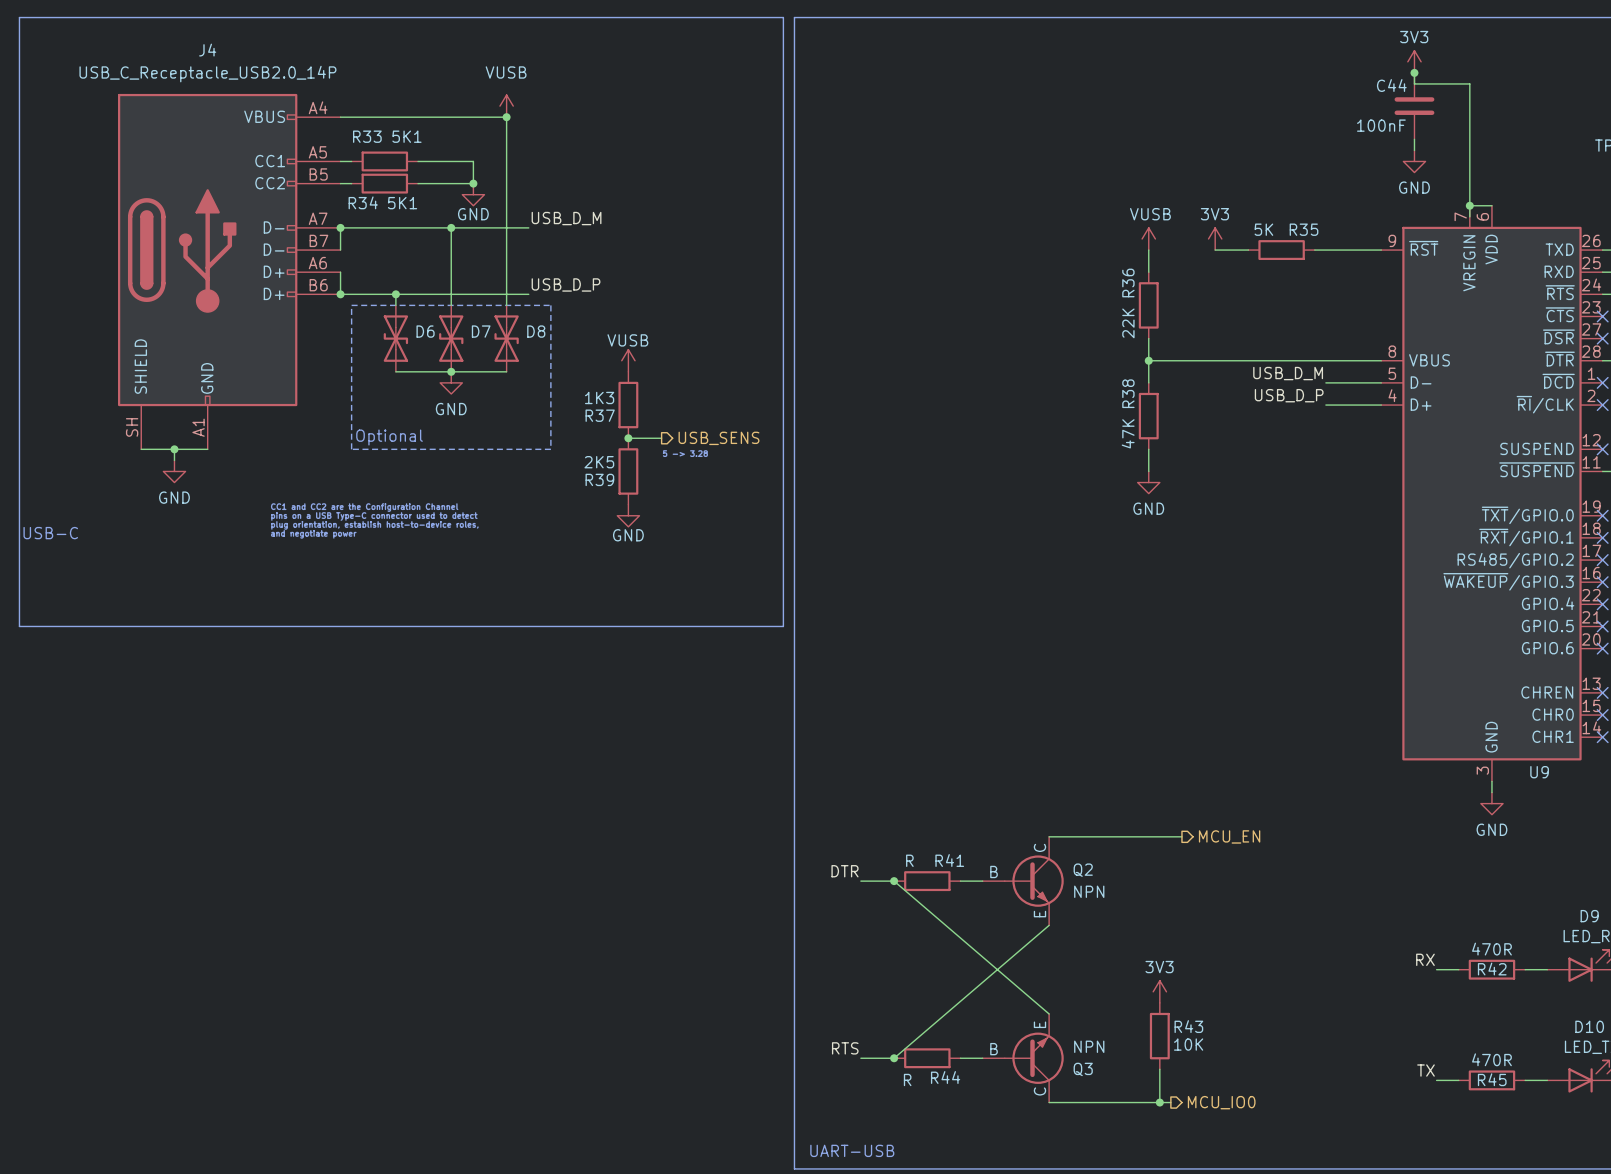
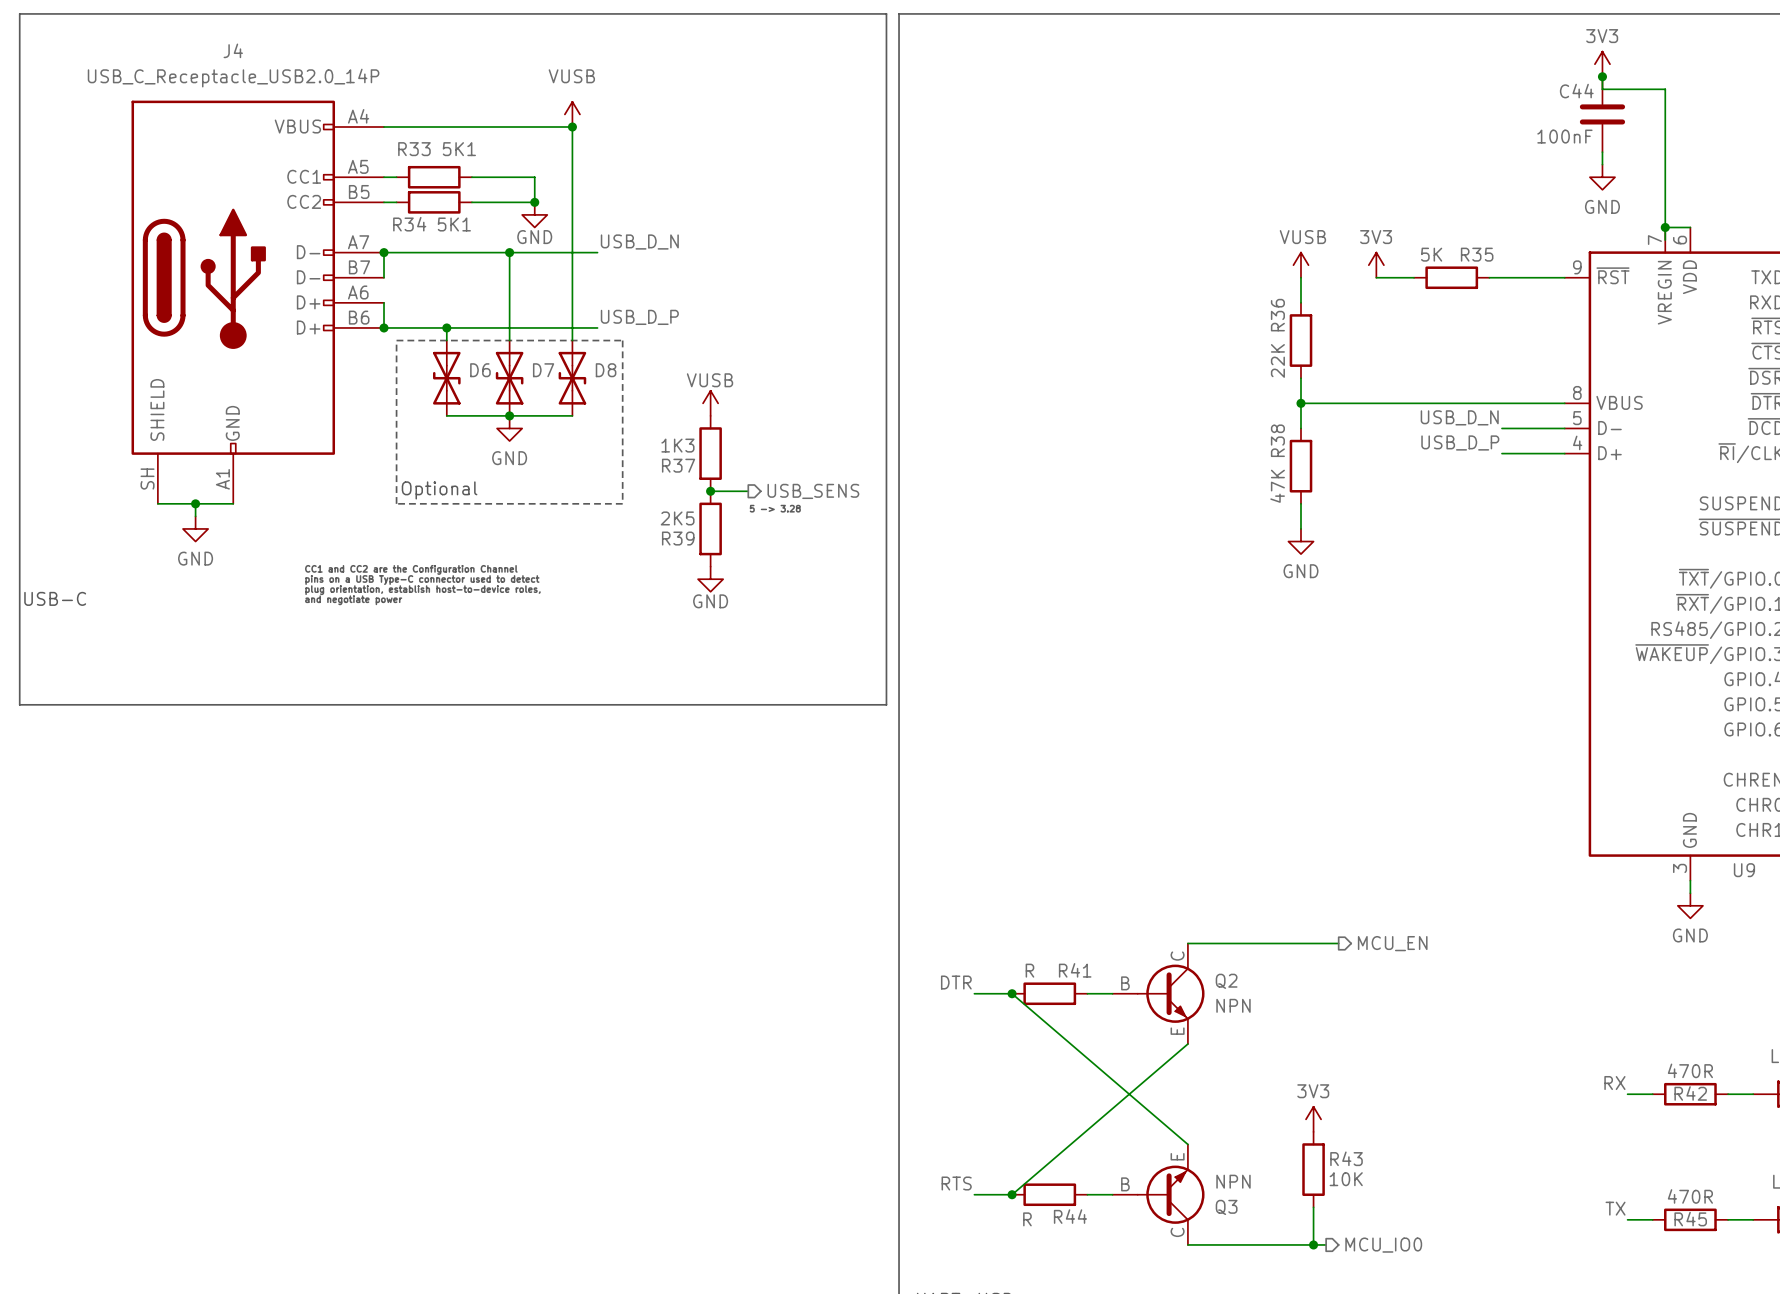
label: USB_D_M (566, 218) -> USB_D_N (639, 242)
label: USB_D_M (1288, 373) -> USB_D_N (1459, 417)

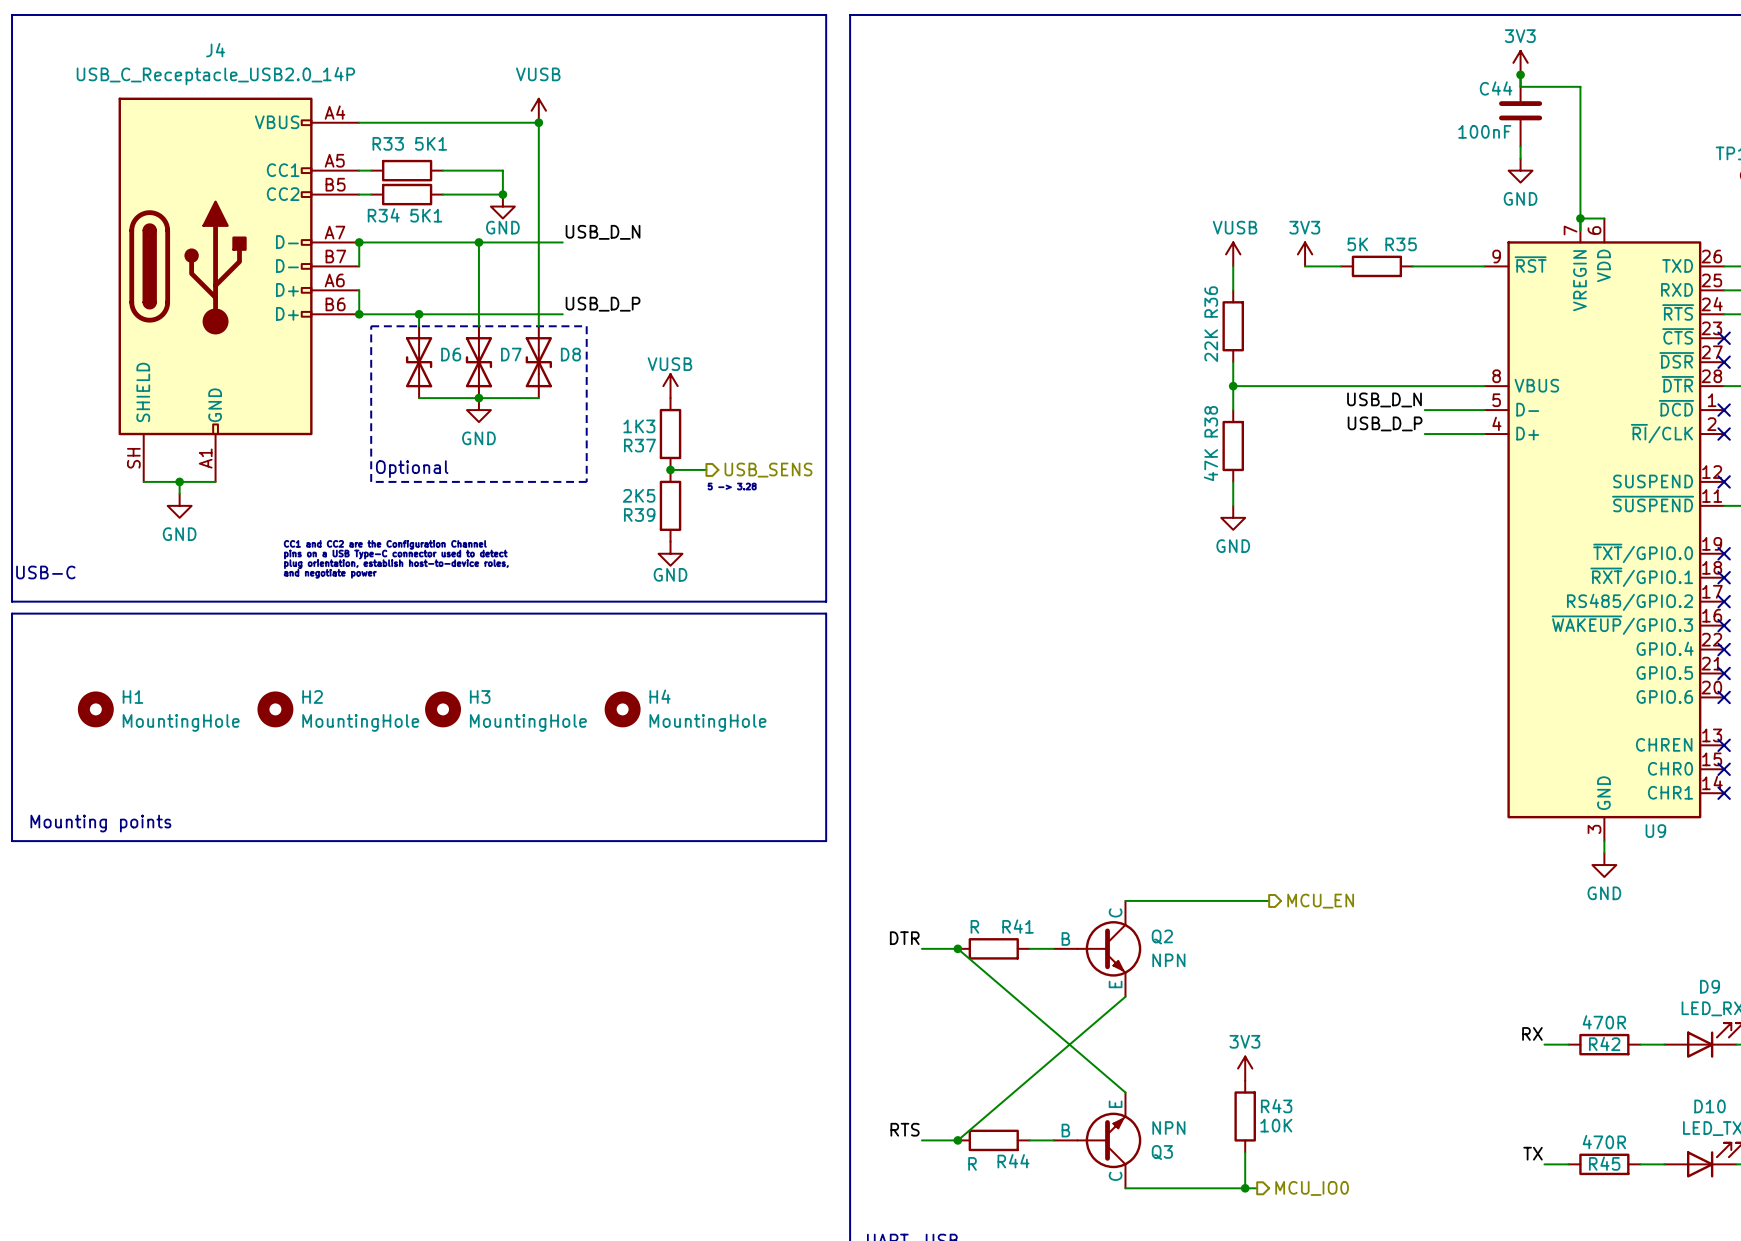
line: (873, 13) (886, 13) (886, 704) (19, 704) -> (826, 14) (826, 601) (12, 601)
line: (19, 629) (19, 642) -> (12, 673) (12, 841) (826, 841) (826, 613) (12, 613)
H1: none -> MountingHole (95, 709)
H2: none -> MountingHole (275, 709)
H3: none -> MountingHole (443, 709)
H4: none -> MountingHole (622, 709)
text: none -> Mounting points (100, 823)

